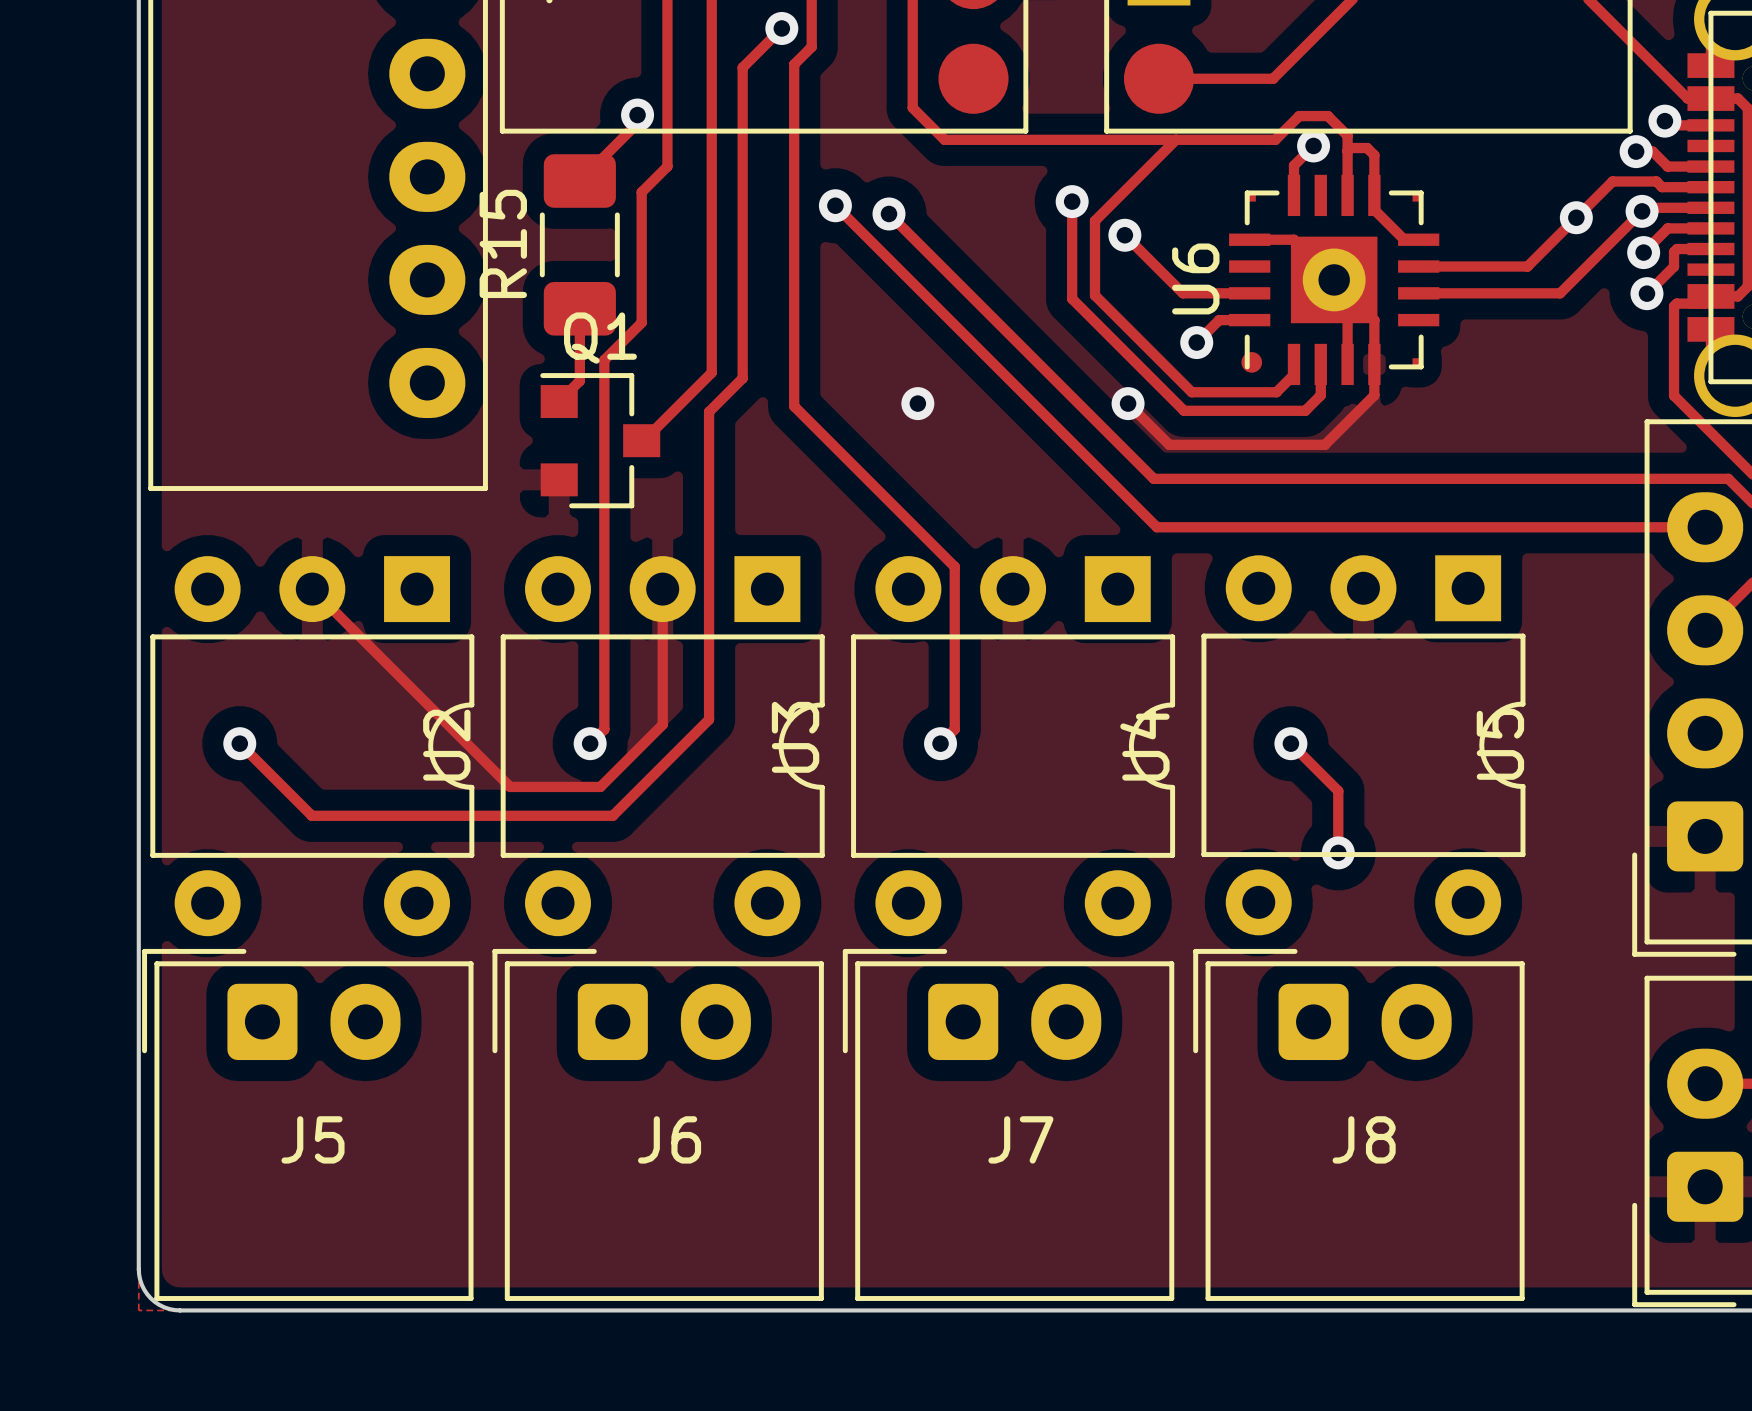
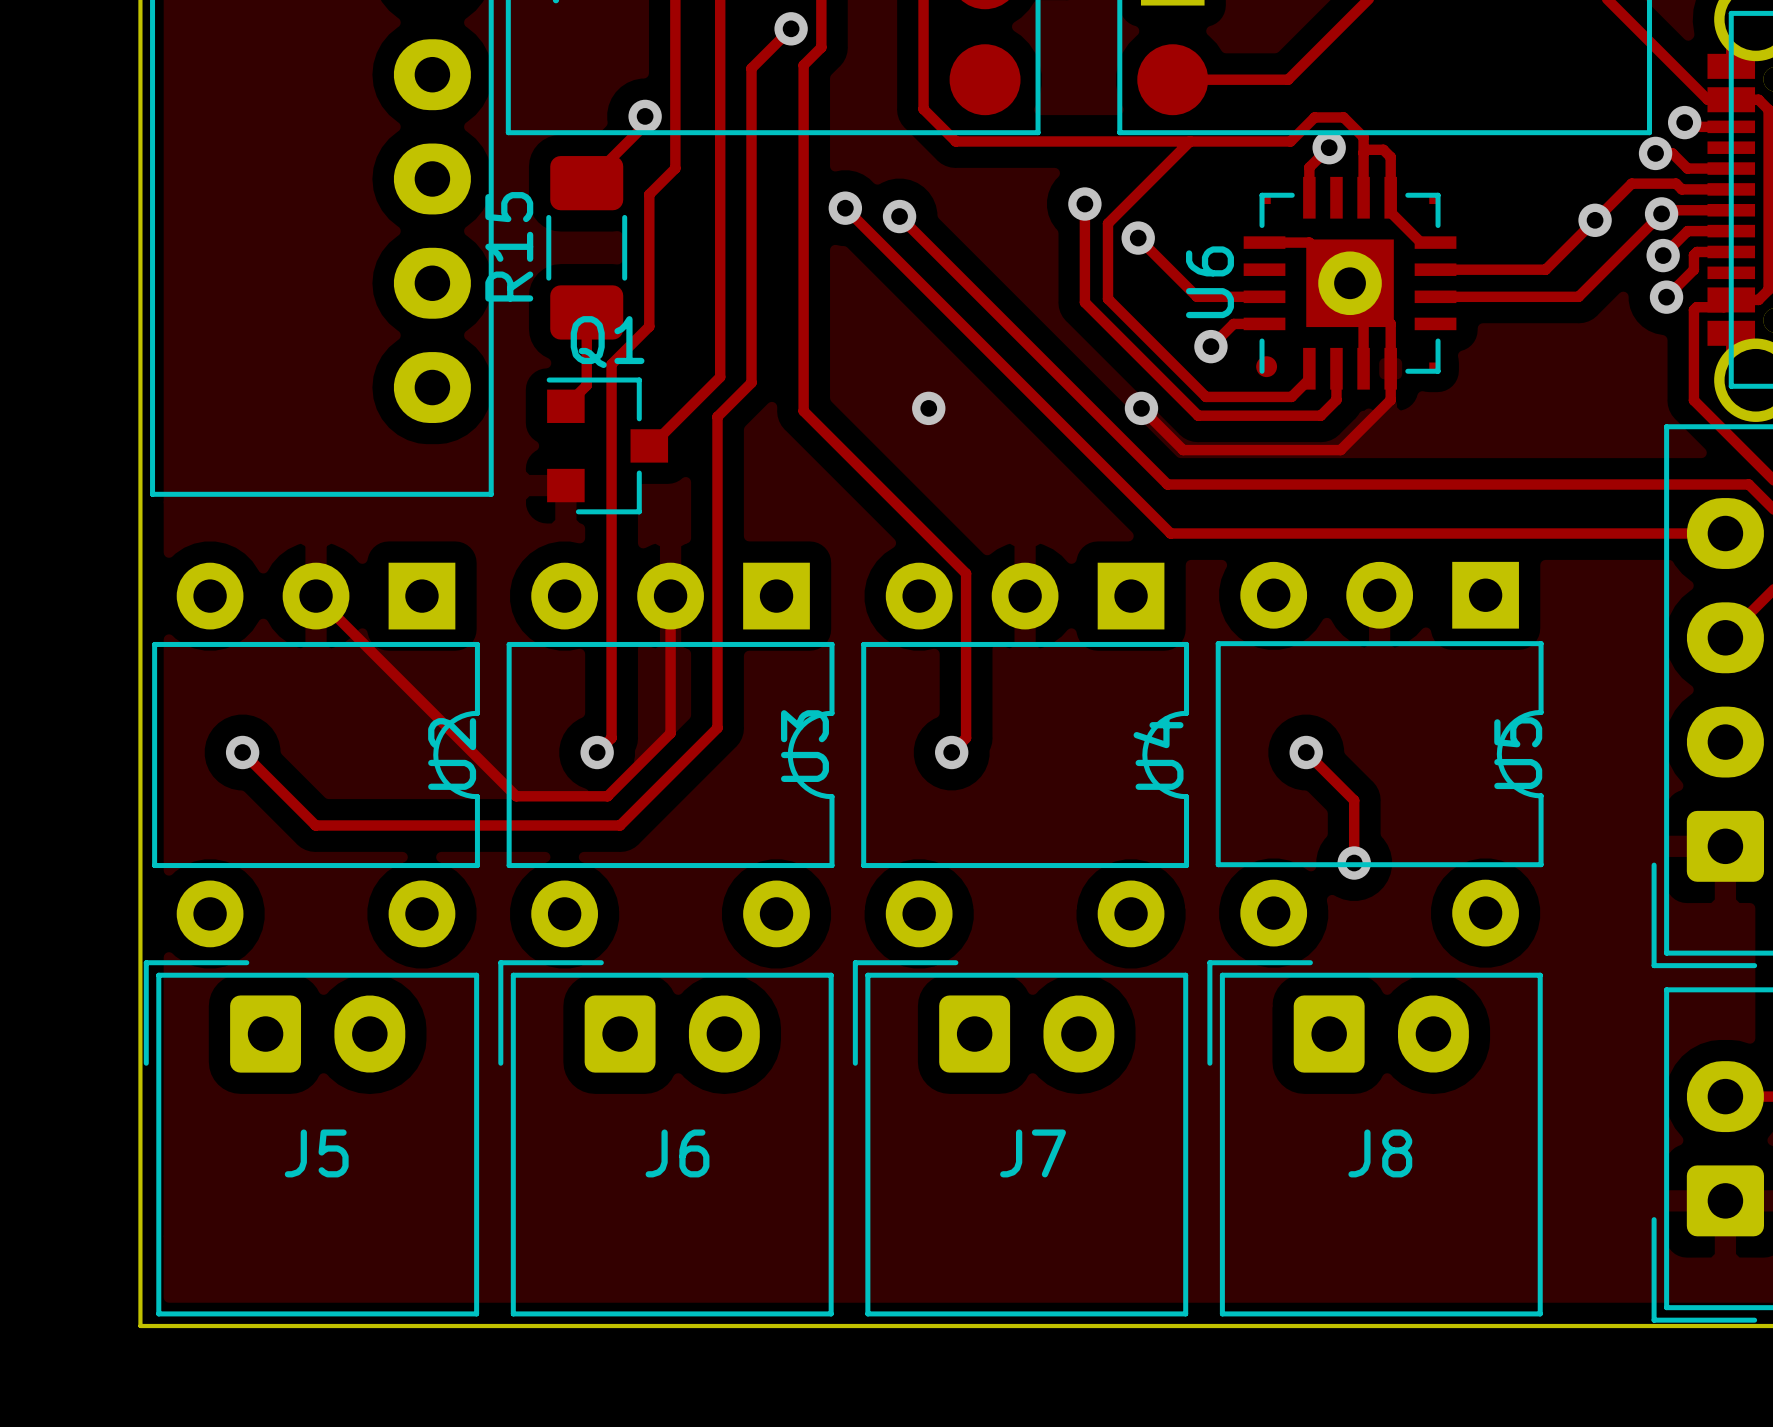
board edge: (138, 1269) (141, 1285) (150, 1298) (164, 1307) (180, 1310) -> (140, 1284) (140, 1326) (182, 1326)

